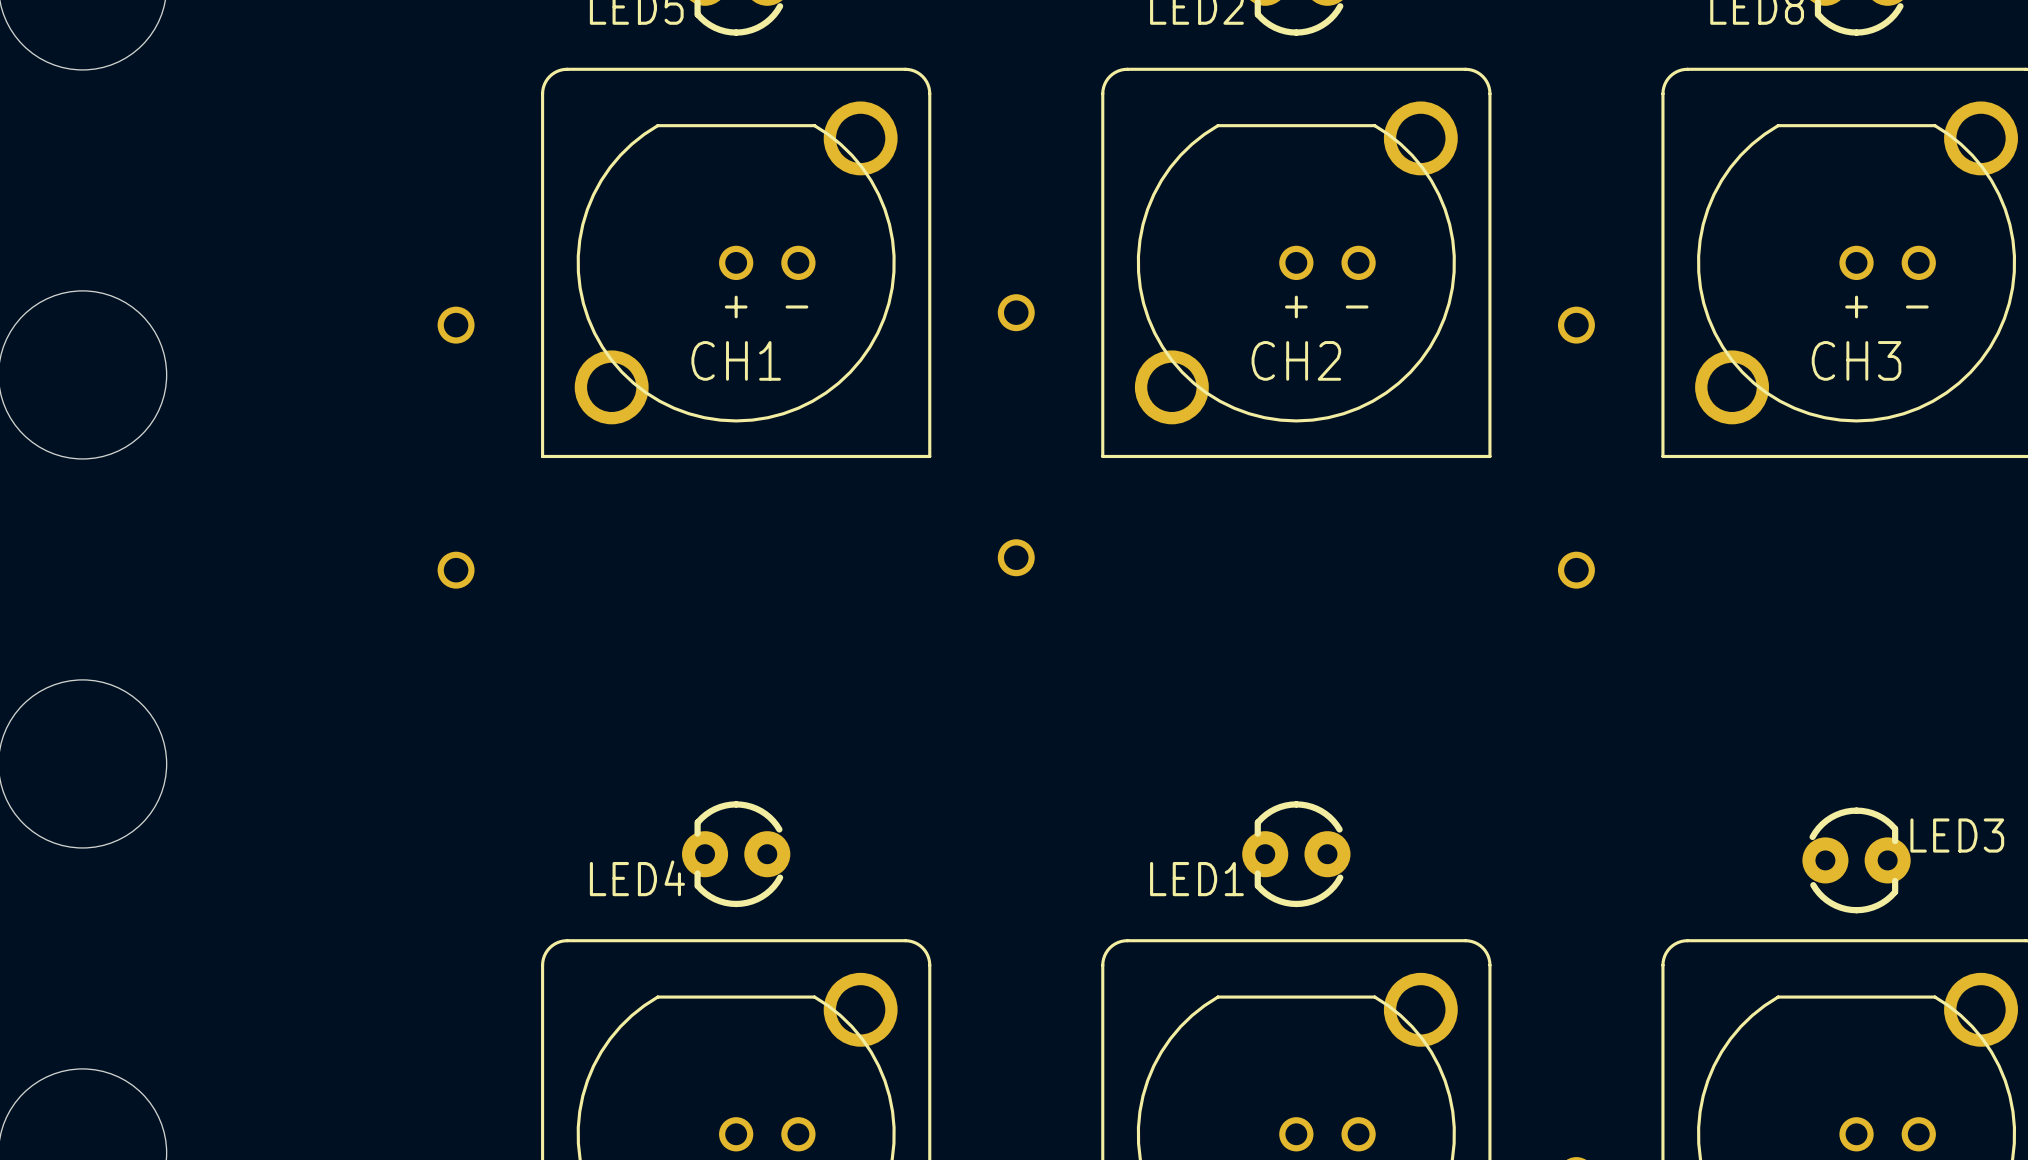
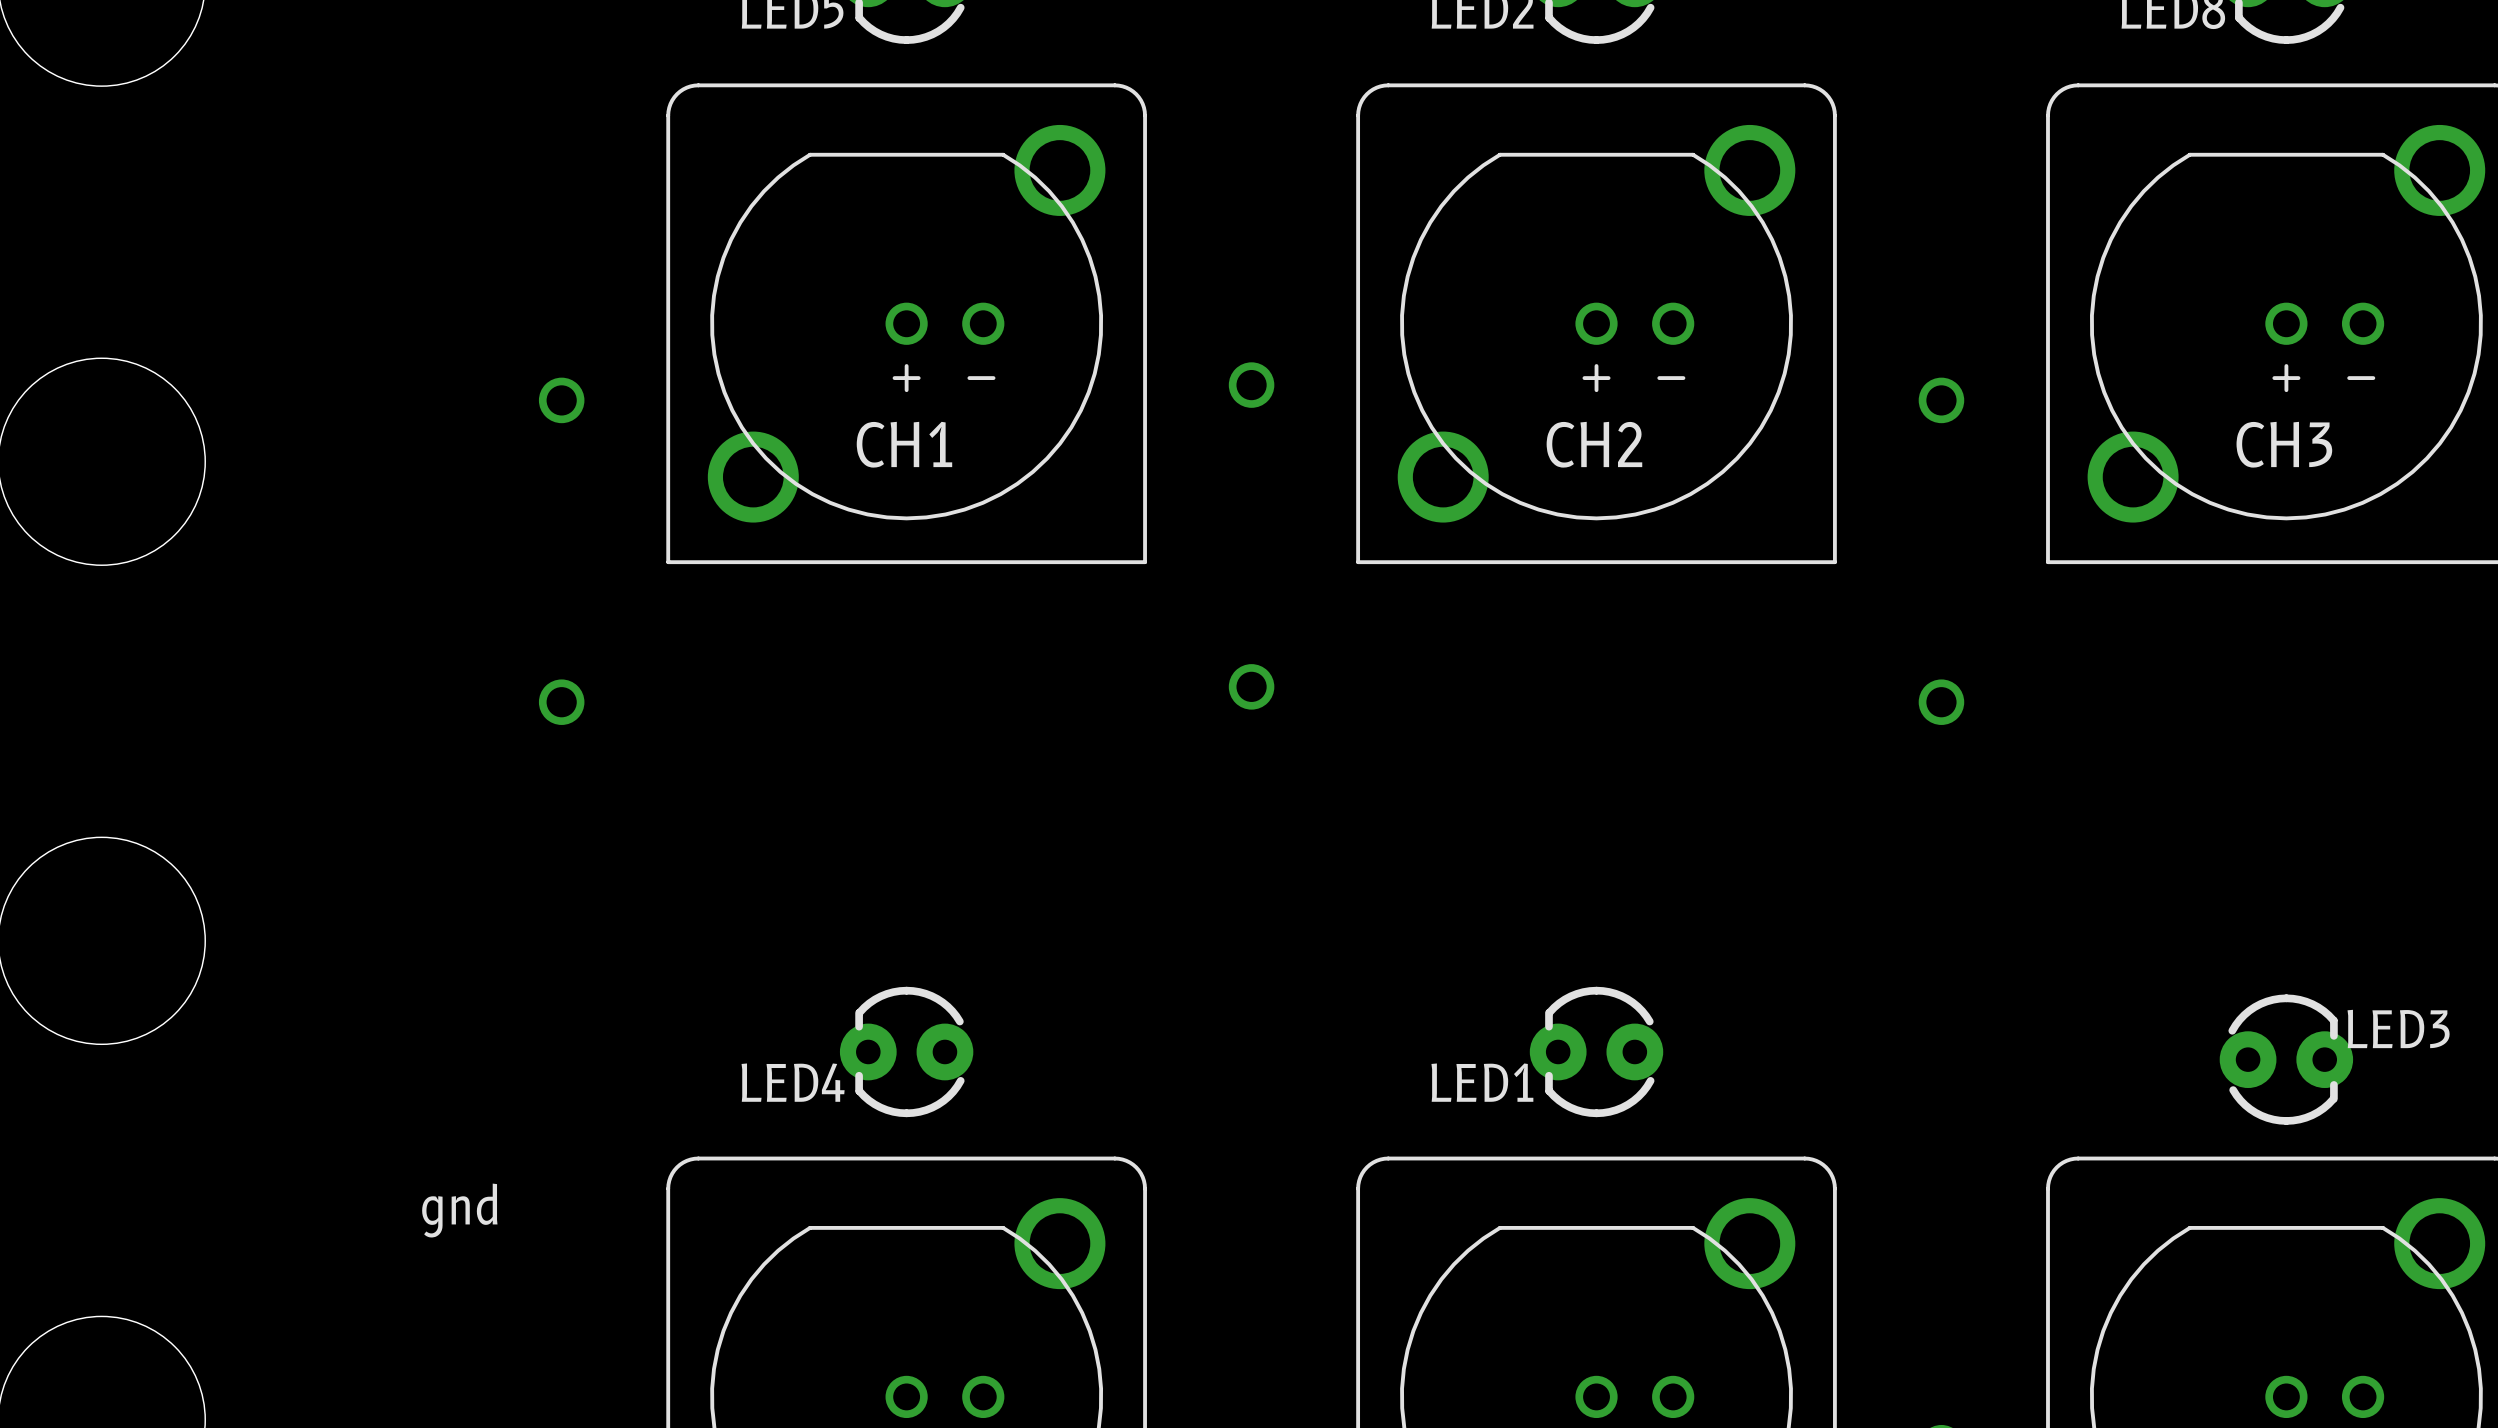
text: none -> gnd (459, 1210)

